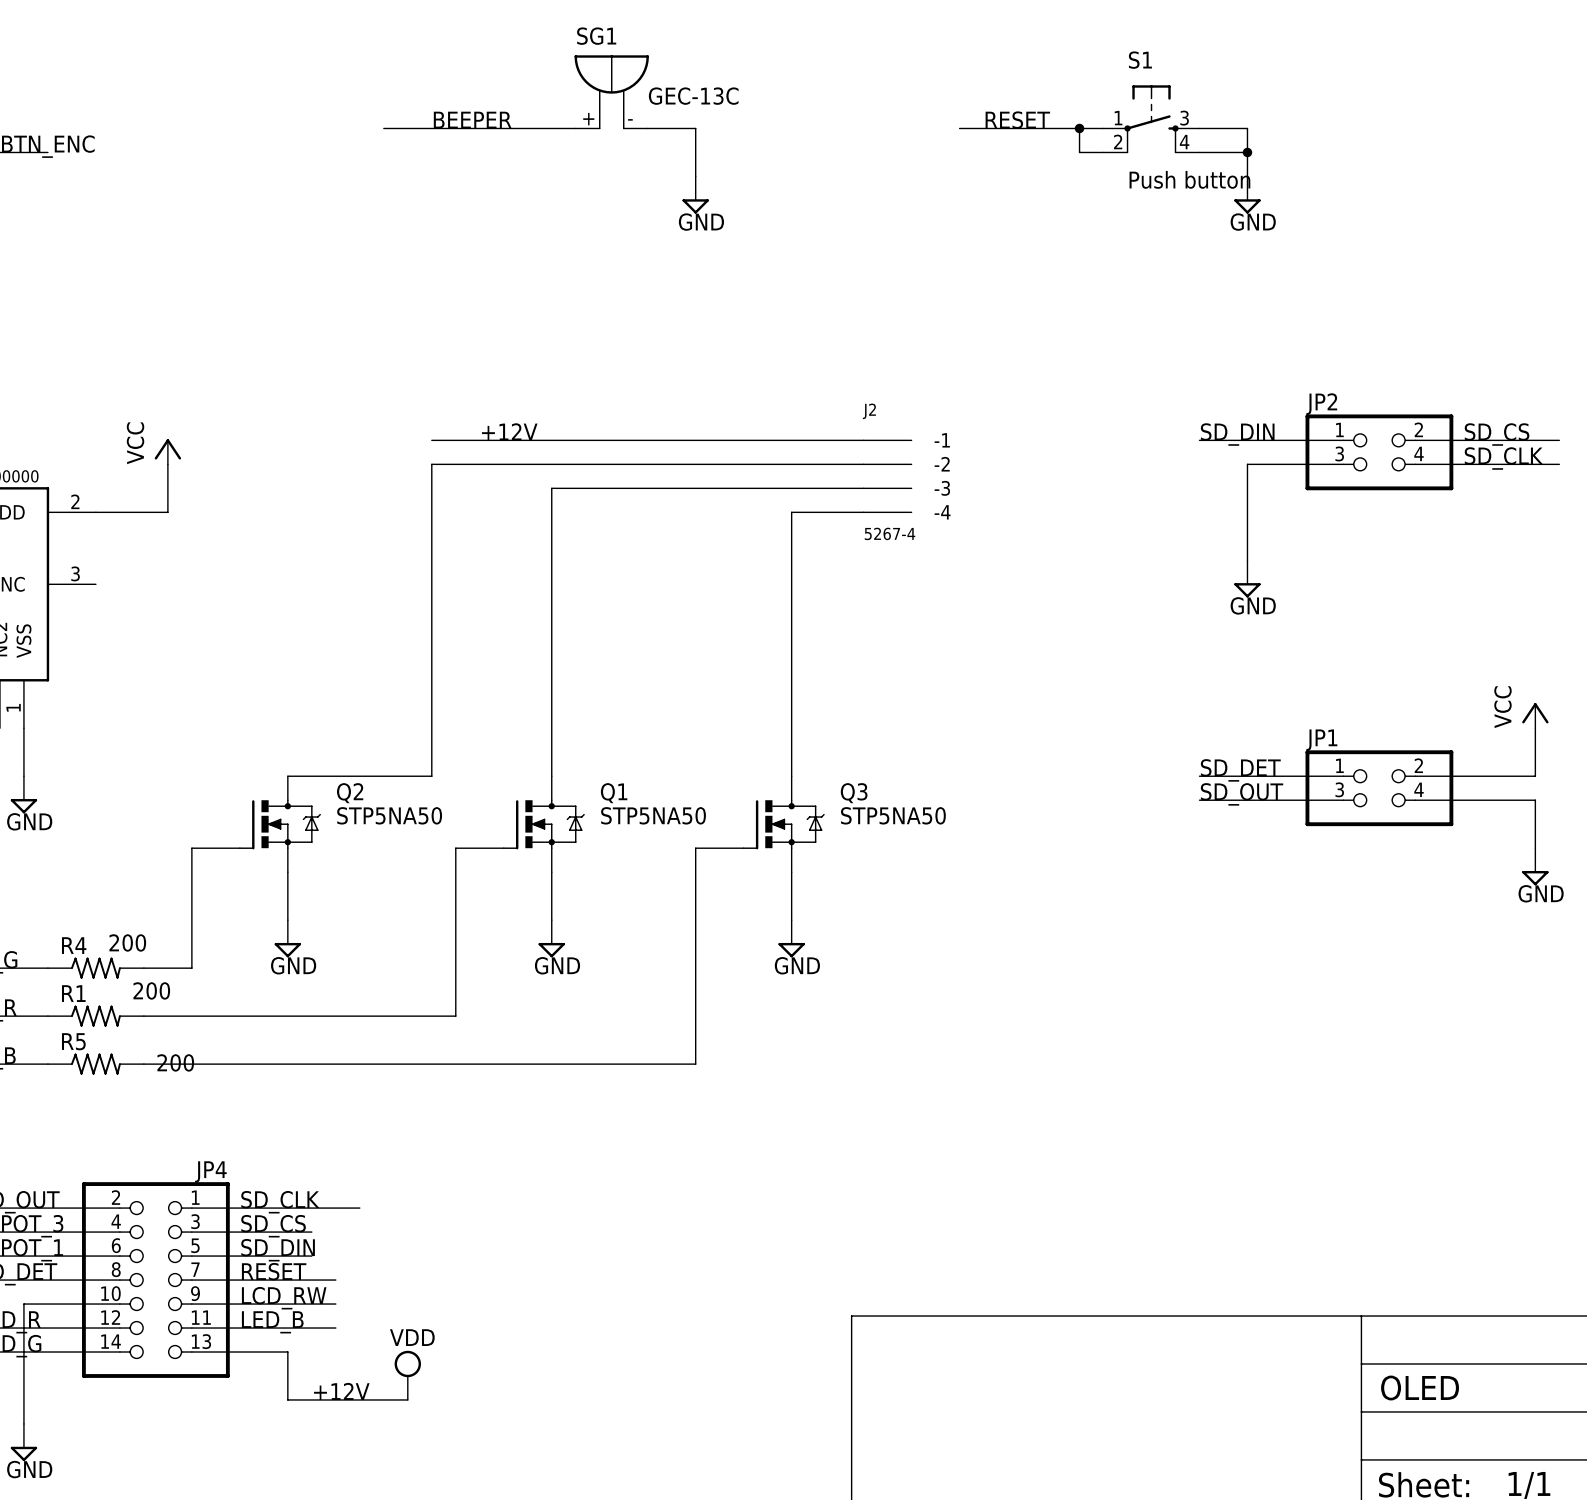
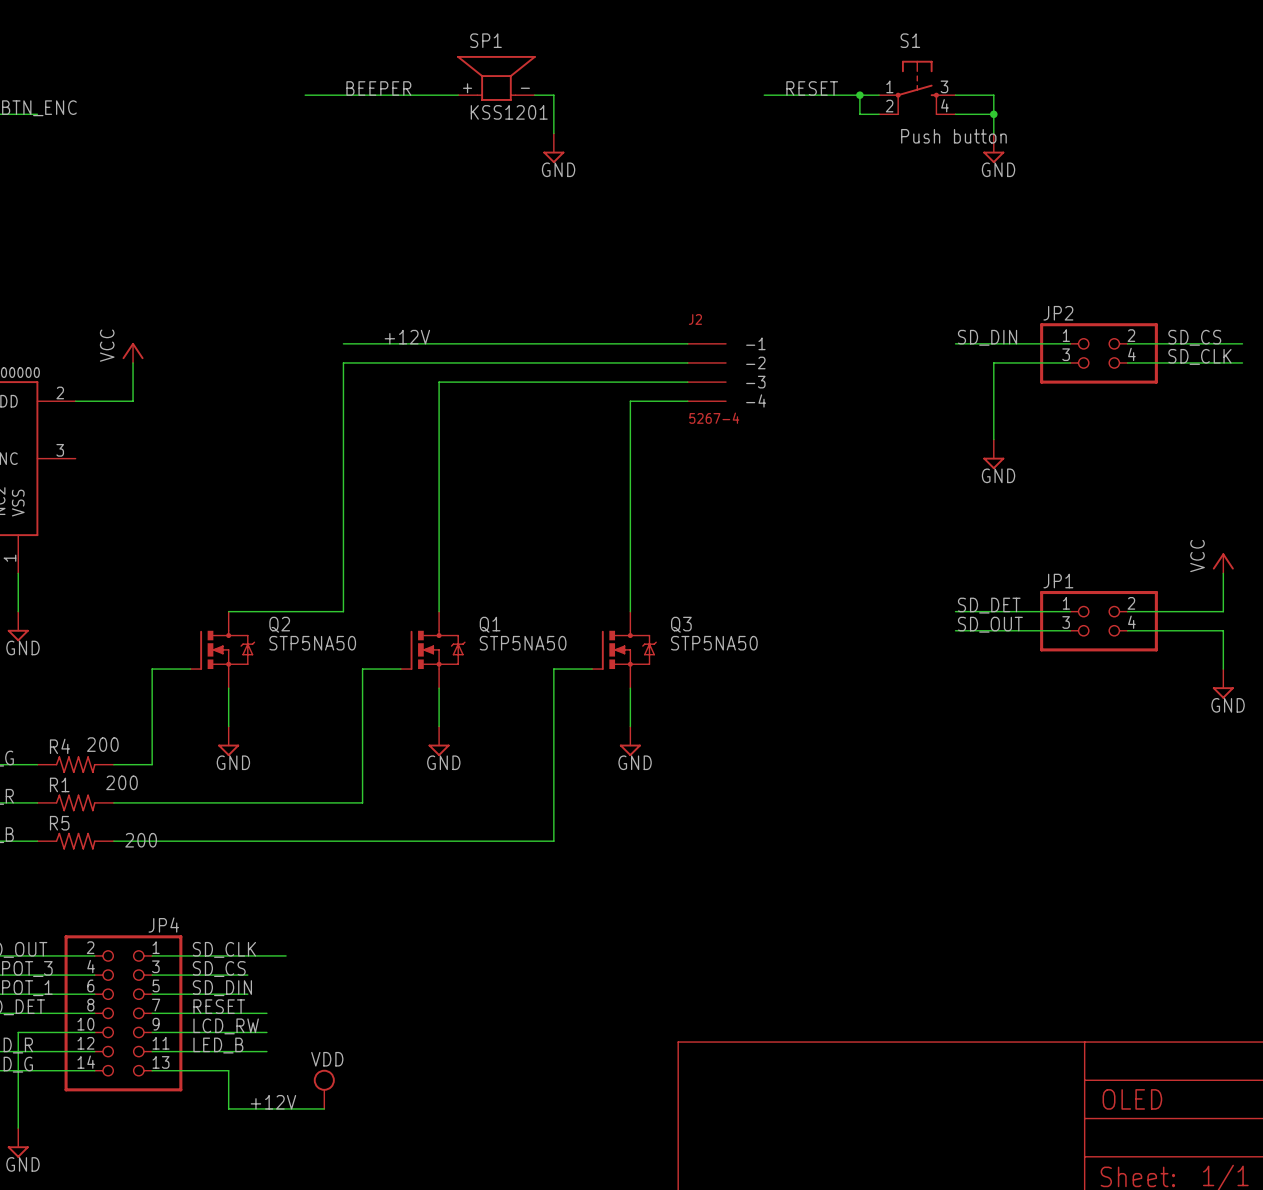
SG1: GEC-13C (611, 92) -> none
SP1: none -> KSS1201 (496, 78)

